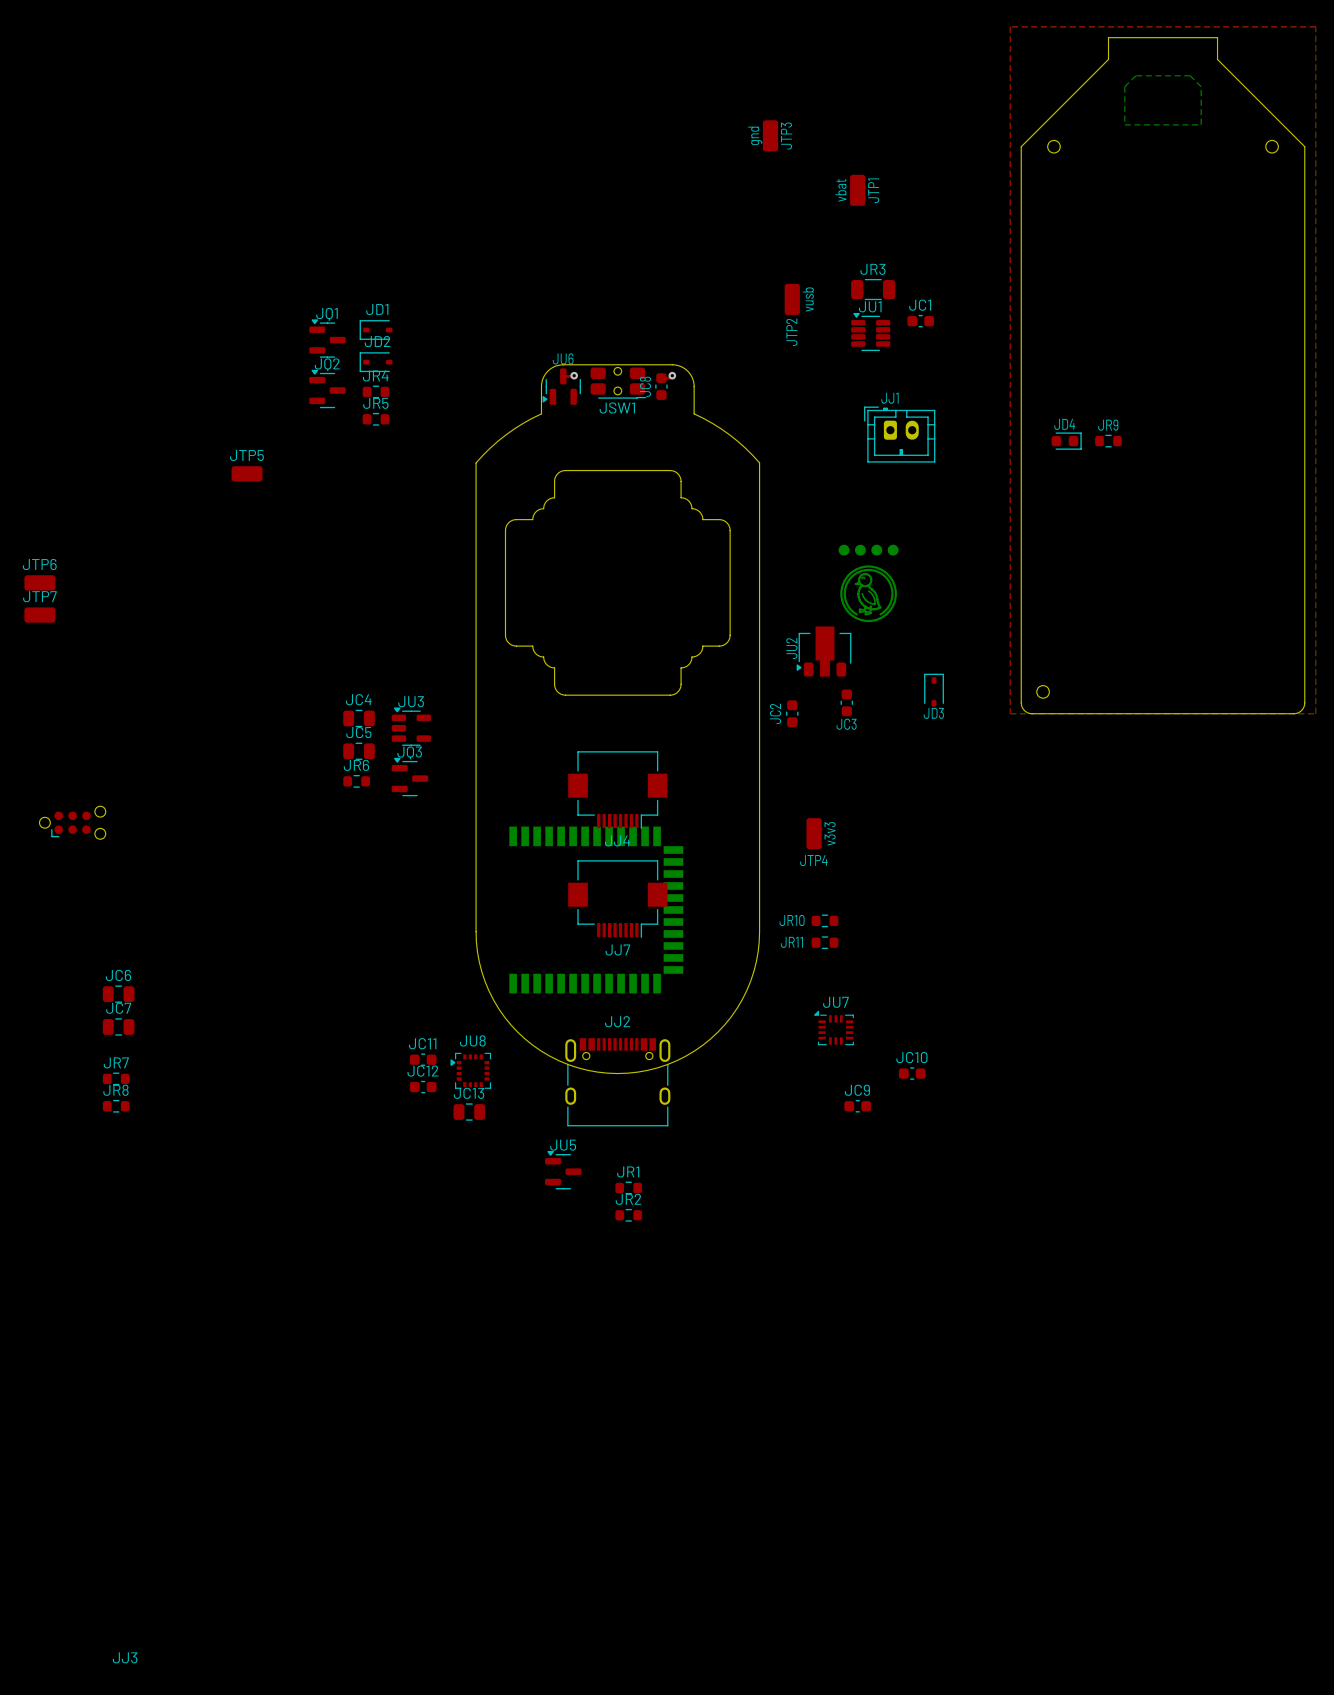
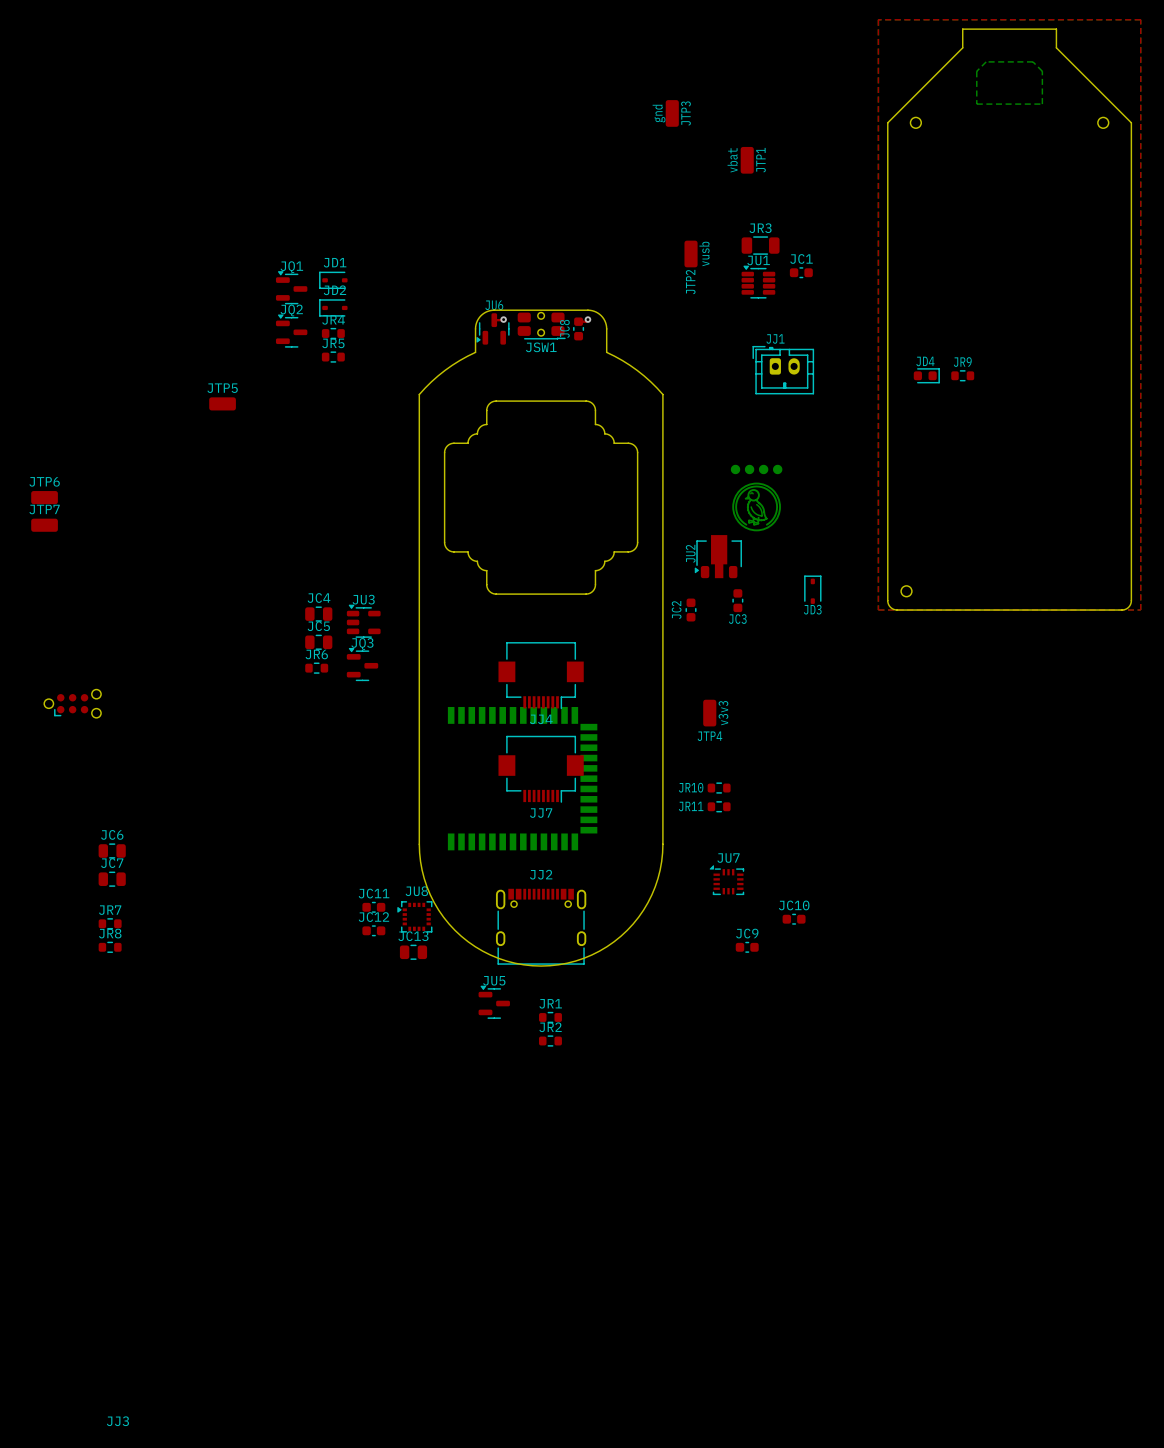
board edge: (476, 931) (479, 961) (488, 990) (504, 1016) (517, 1032) (541, 1051) (568, 1064) (597, 1072) (617, 1073) (637, 1072) (667, 1064) (694, 1051) (718, 1032) (737, 1008) (746, 990) (756, 961) (759, 931) -> (419, 797) (419, 852) (422, 870) (430, 894) (443, 917) (461, 936) (490, 955) (515, 963) (541, 966) (567, 963) (599, 951) (620, 936) (638, 917) (651, 894) (660, 870) (662, 852) (662, 797)

